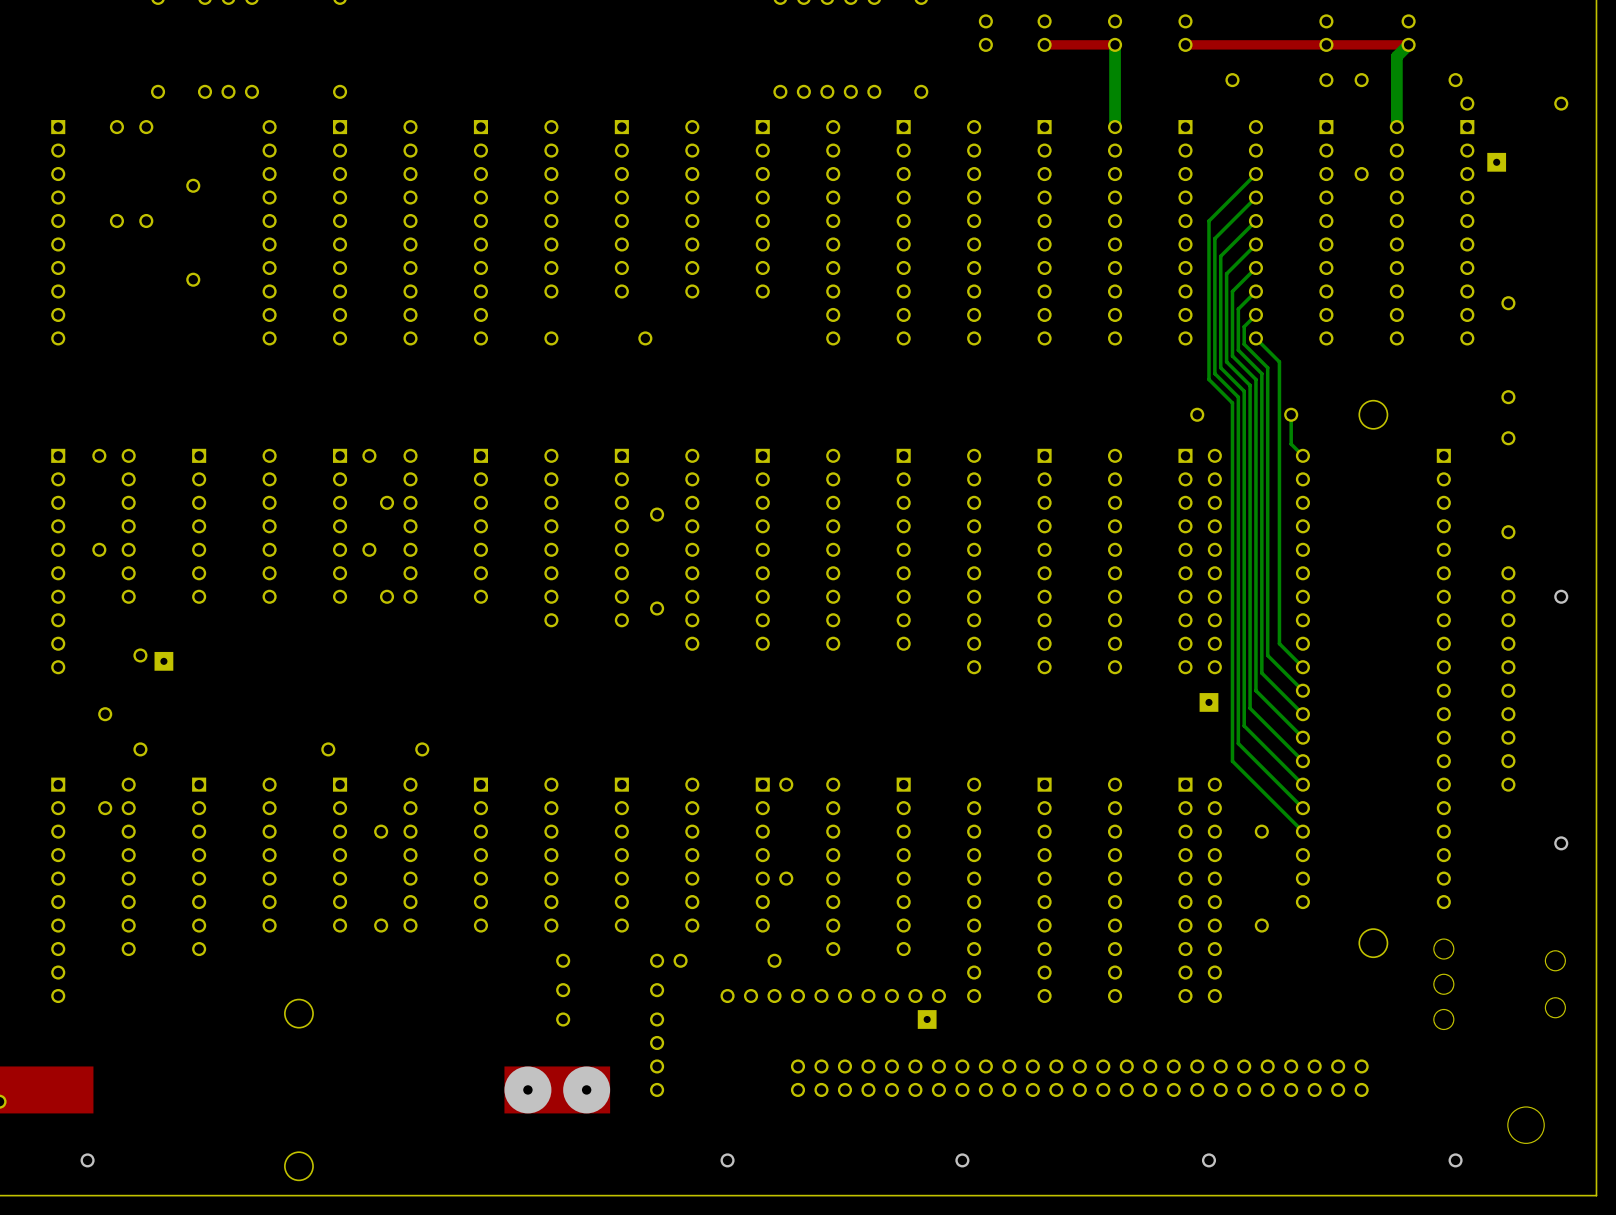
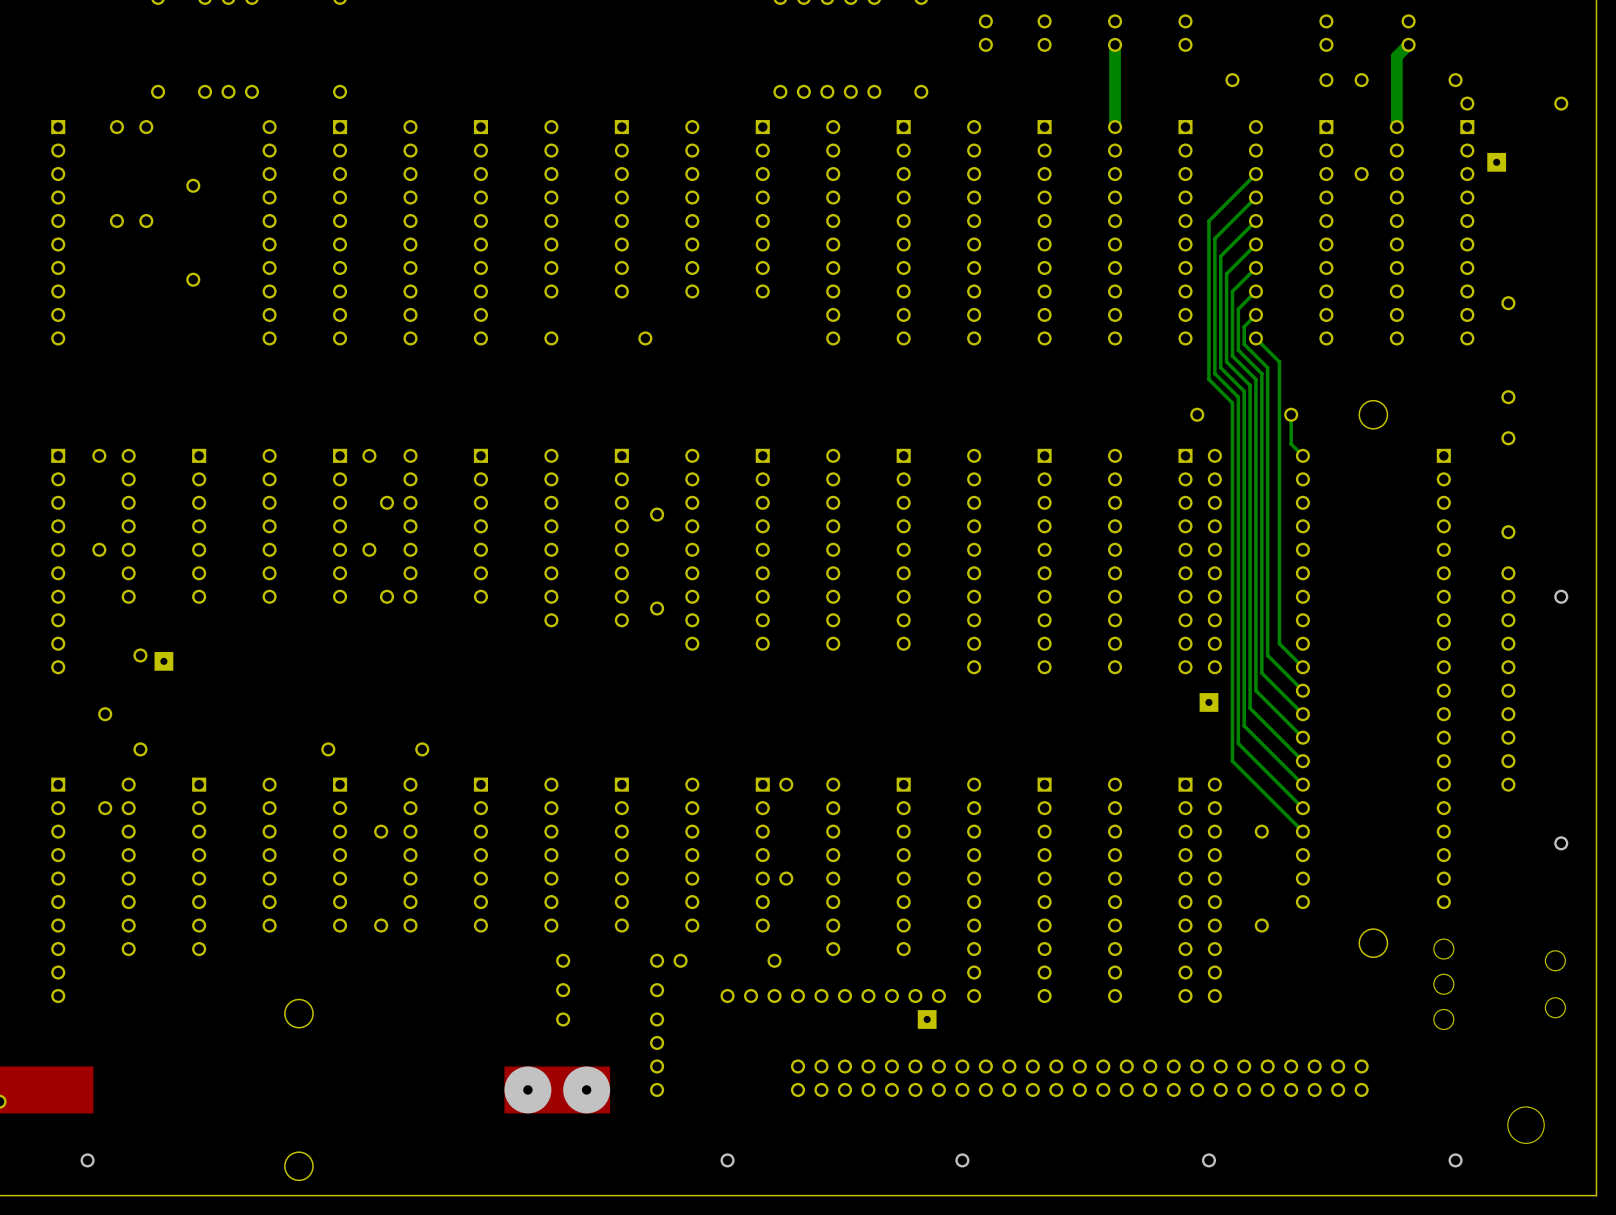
top track: (1115, 44) (1044, 44) -> none
top track: (1408, 44) (1185, 44) -> none

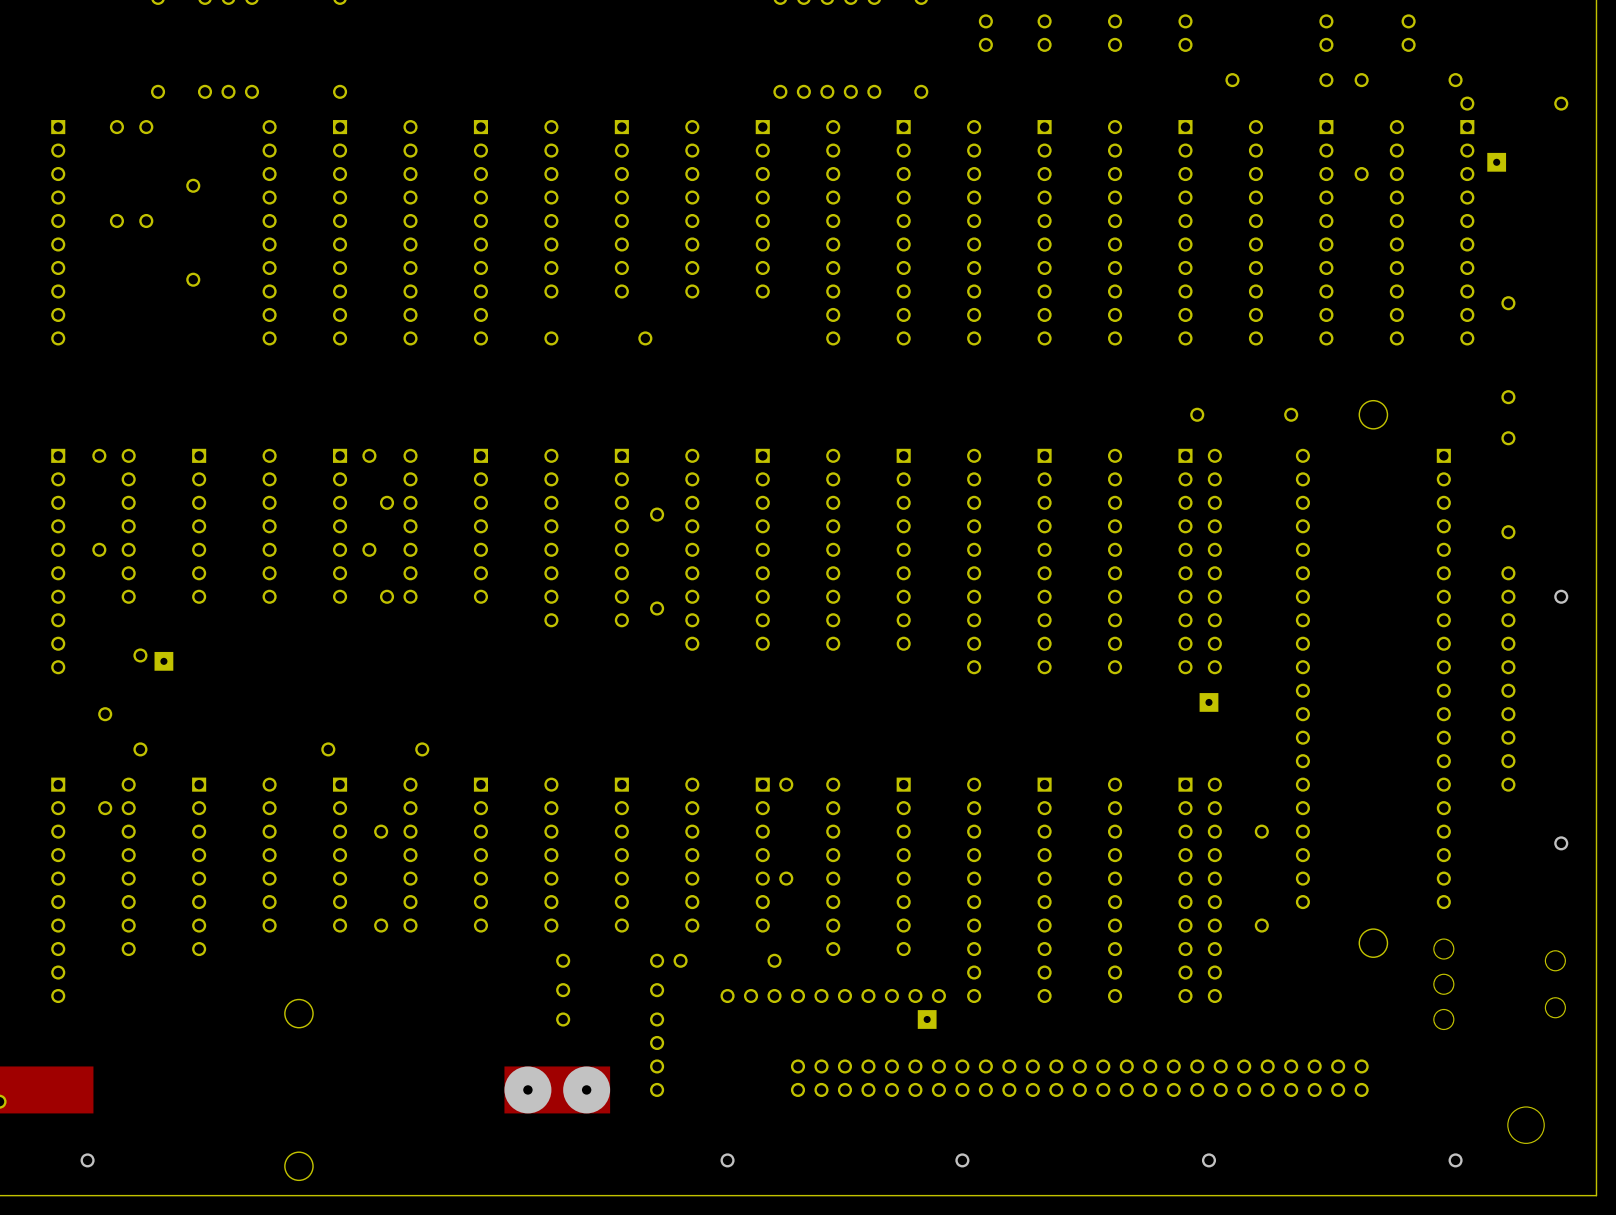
bottom track: (1115, 44) (1115, 127) -> none
bottom track: (1408, 44) (1396, 56) (1396, 127) -> none
bottom track: (1255, 174) (1208, 221) (1208, 379) (1232, 403) (1232, 761) (1302, 831) -> none
bottom track: (1255, 197) (1214, 238) (1214, 373) (1238, 397) (1238, 743) (1302, 808) -> none
bottom track: (1255, 221) (1220, 256) (1220, 367) (1244, 391) (1244, 725) (1302, 784) -> none
bottom track: (1255, 244) (1226, 273) (1226, 361) (1250, 385) (1250, 708) (1302, 761) -> none
bottom track: (1255, 267) (1232, 291) (1232, 356) (1255, 379) (1255, 690) (1302, 737) -> none
bottom track: (1255, 291) (1238, 309) (1238, 350) (1261, 373) (1261, 673) (1302, 714) -> none
bottom track: (1255, 314) (1244, 326) (1244, 344) (1267, 367) (1267, 655) (1302, 690) -> none
bottom track: (1255, 338) (1279, 361) (1279, 643) (1302, 667) -> none
bottom track: (1291, 414) (1291, 444) (1302, 455) -> none

